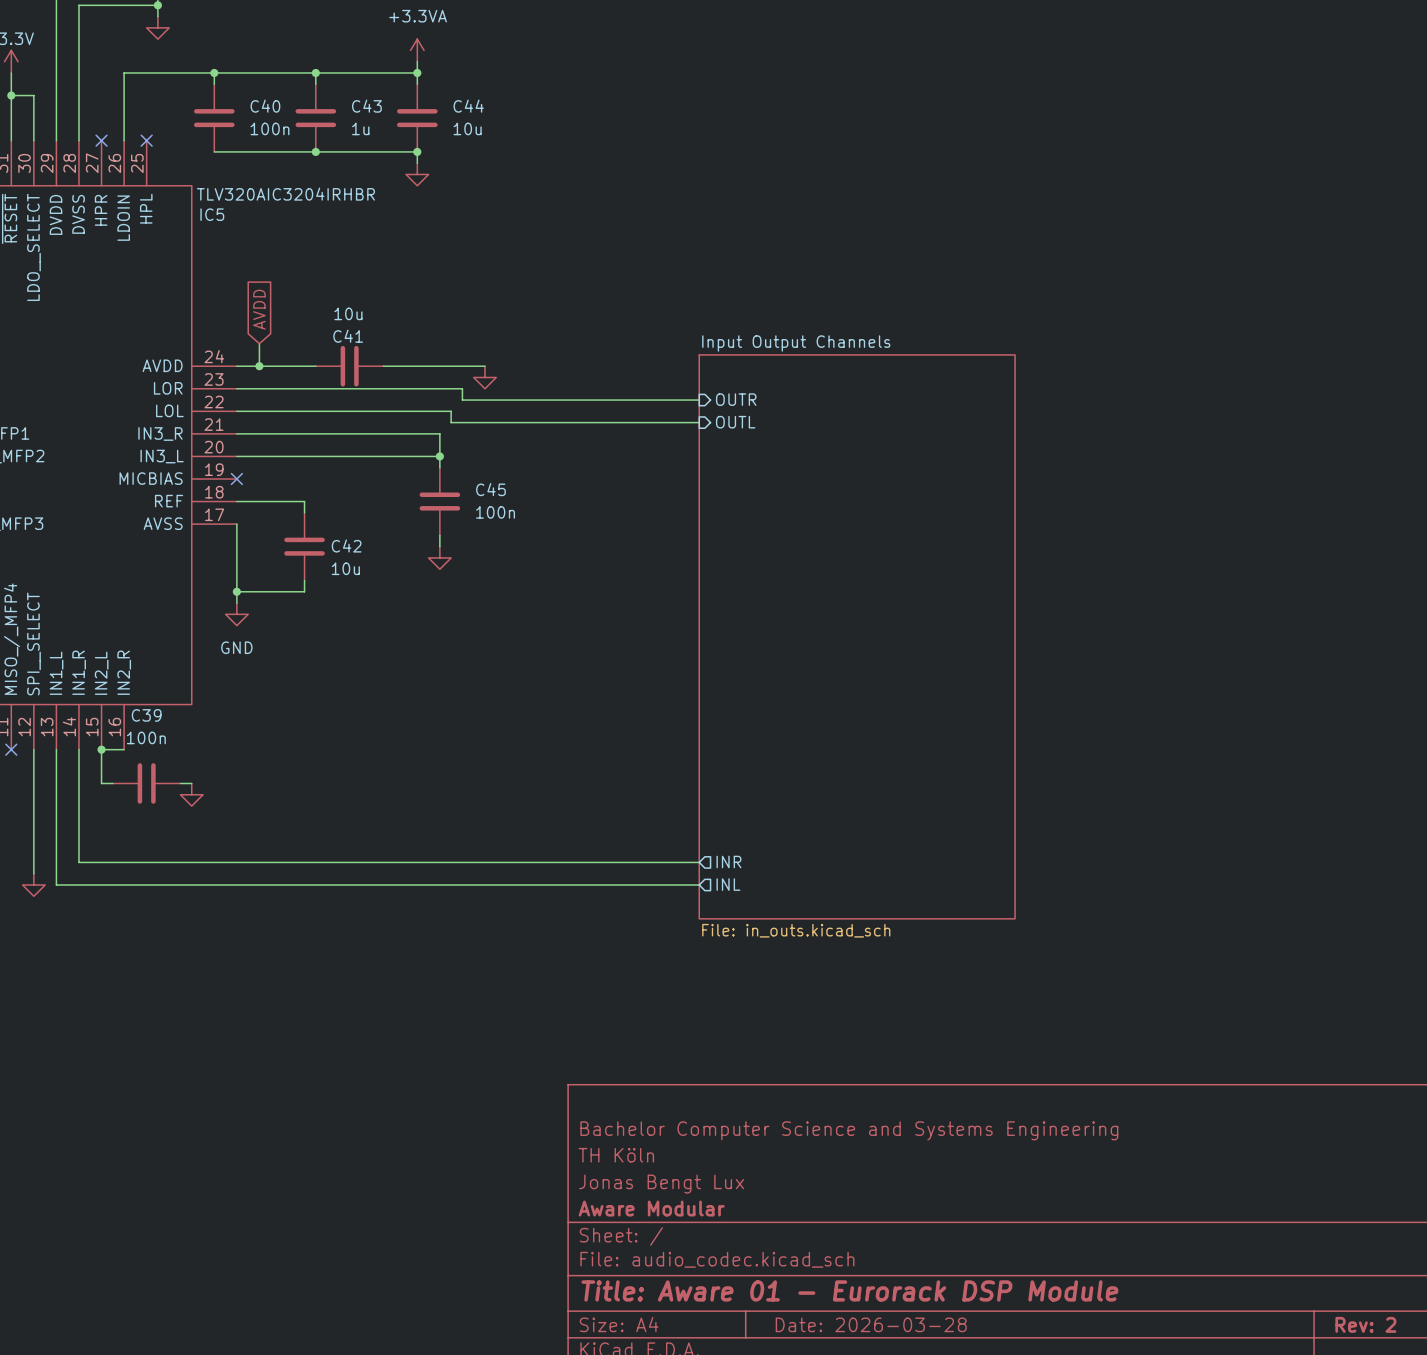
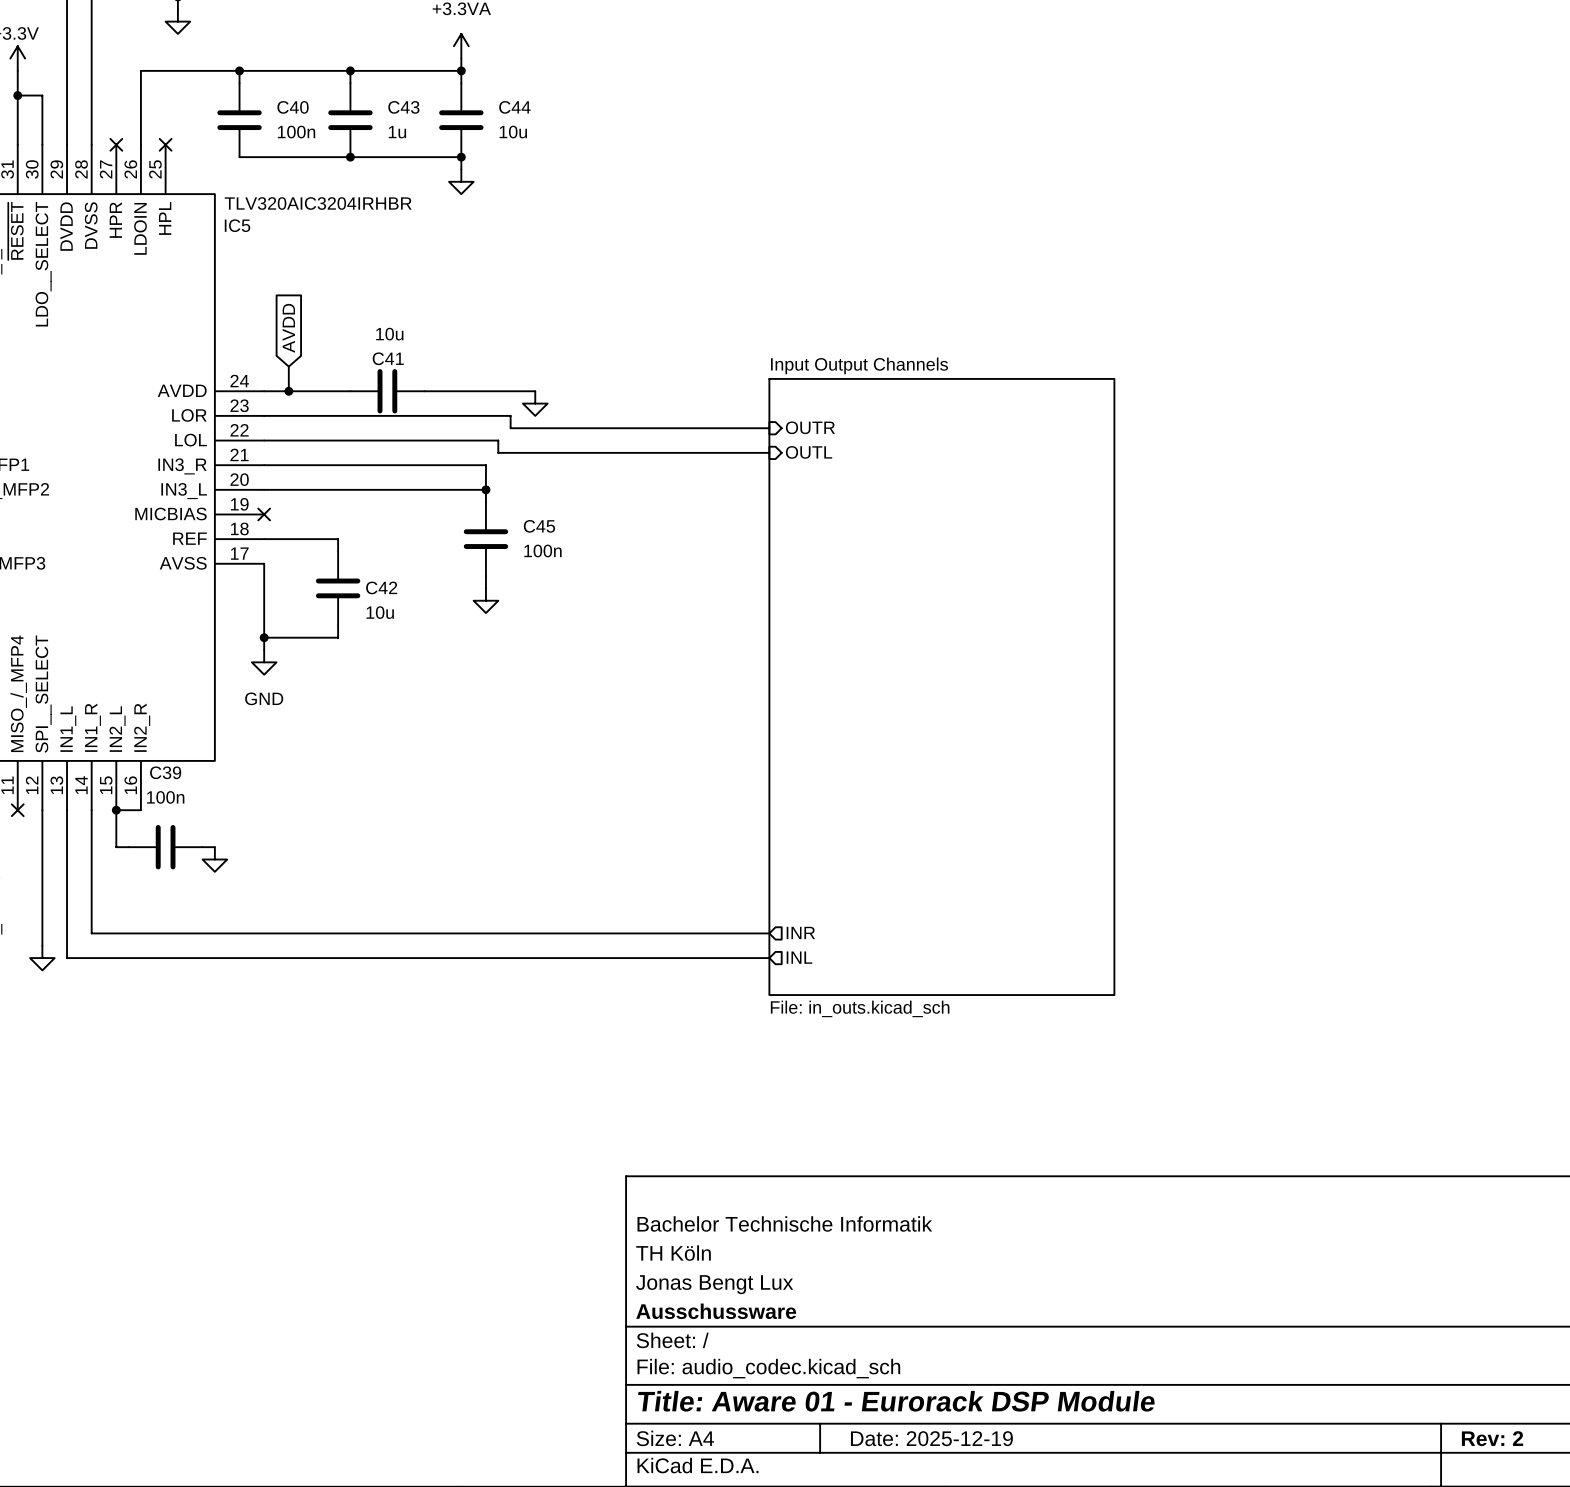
title block: Bachelor Computer Science and Systems Engineering (849, 1130) -> Bachelor Technische Informatik (784, 1223)
title block: Aware Modular (651, 1208) -> Ausschussware (716, 1311)
title block: Date: 2026-03-28 (871, 1324) -> Date: 2025-12-19 (931, 1438)

